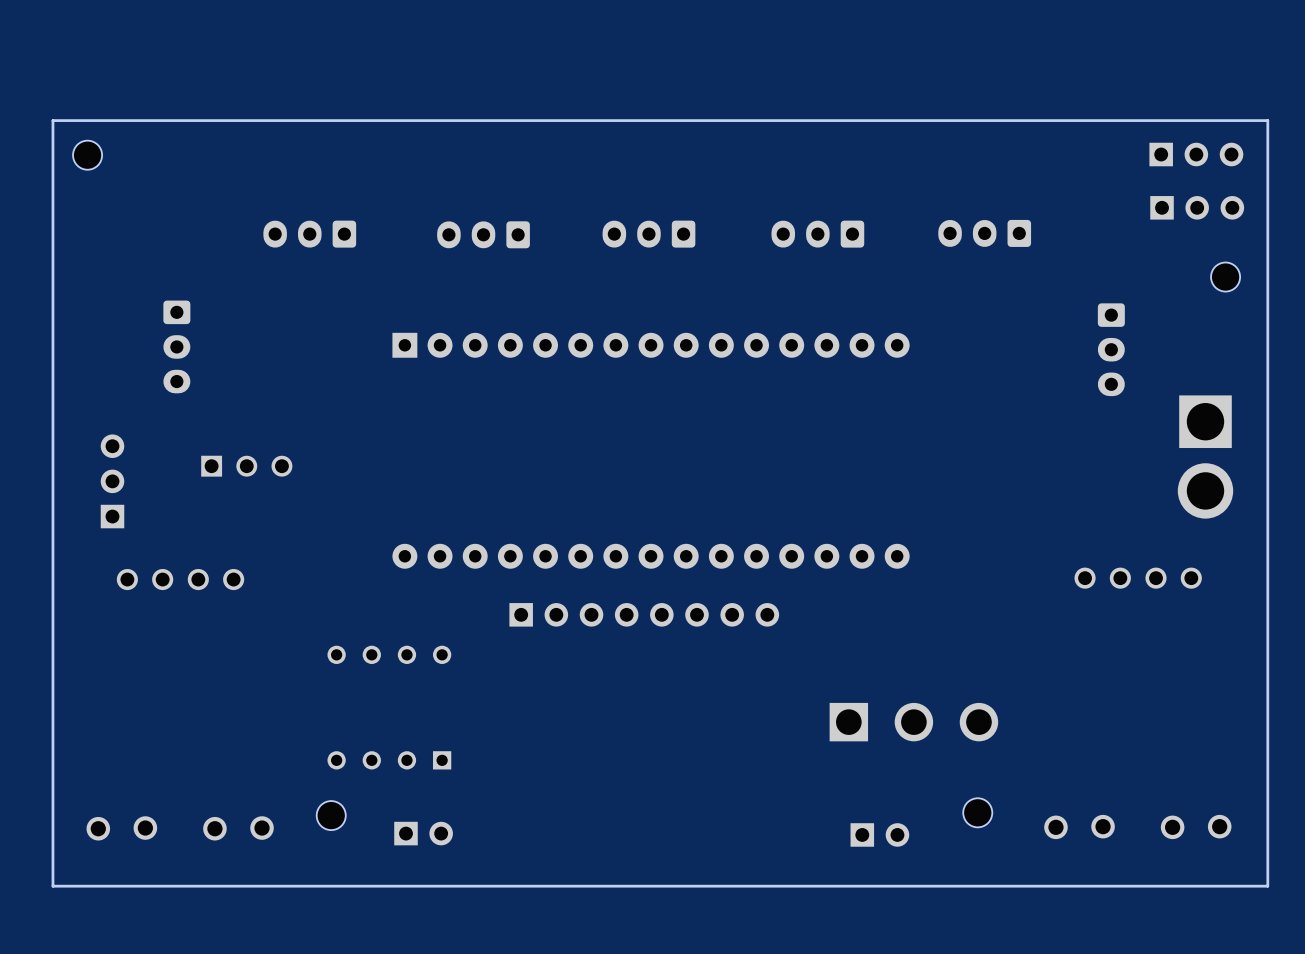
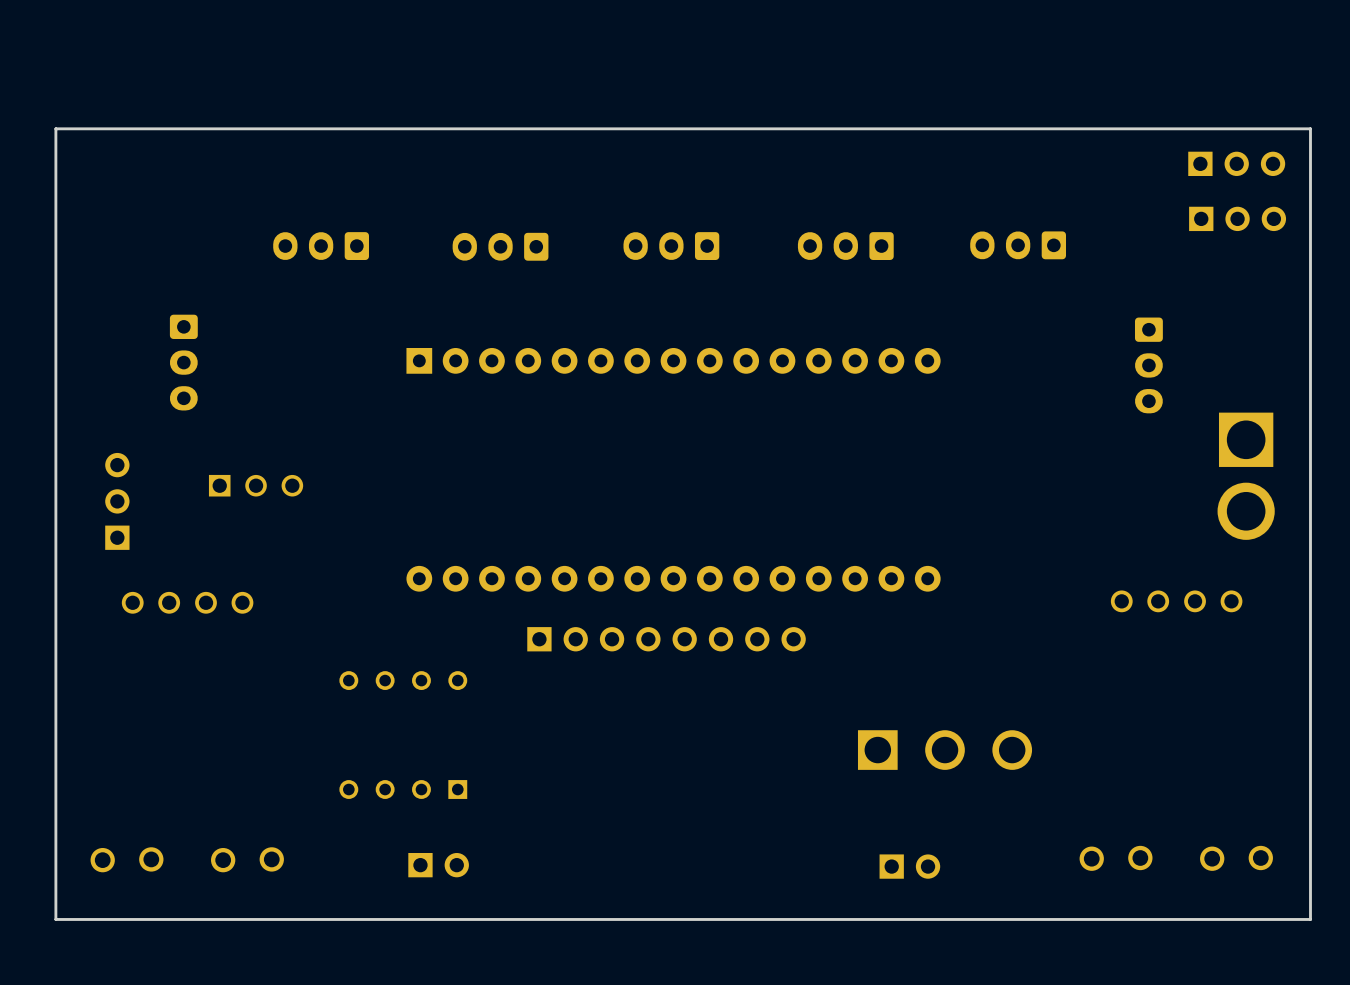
part: (87, 155) -> none
part: (1225, 277) -> none
part: (977, 812) -> none
part: (331, 815) -> none

